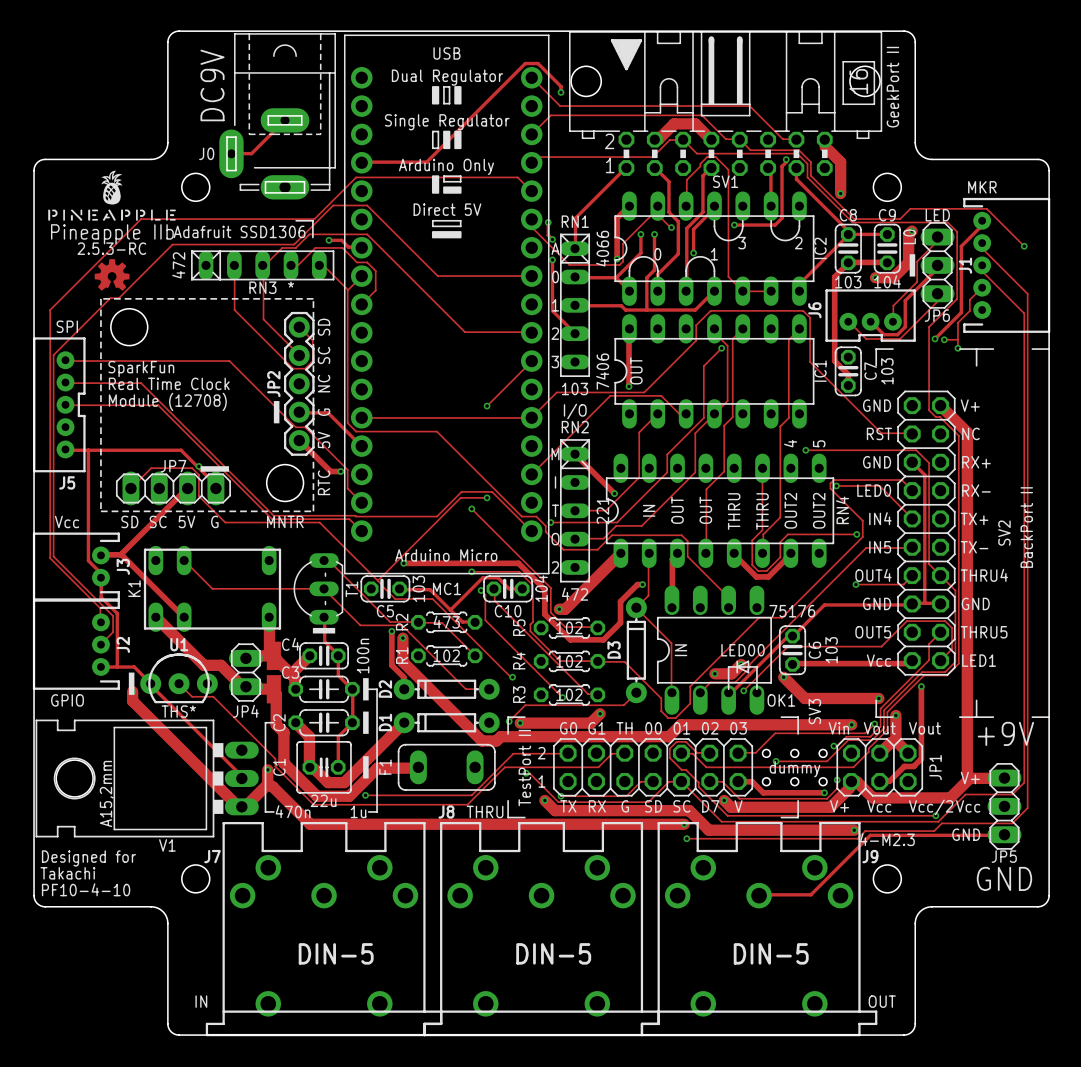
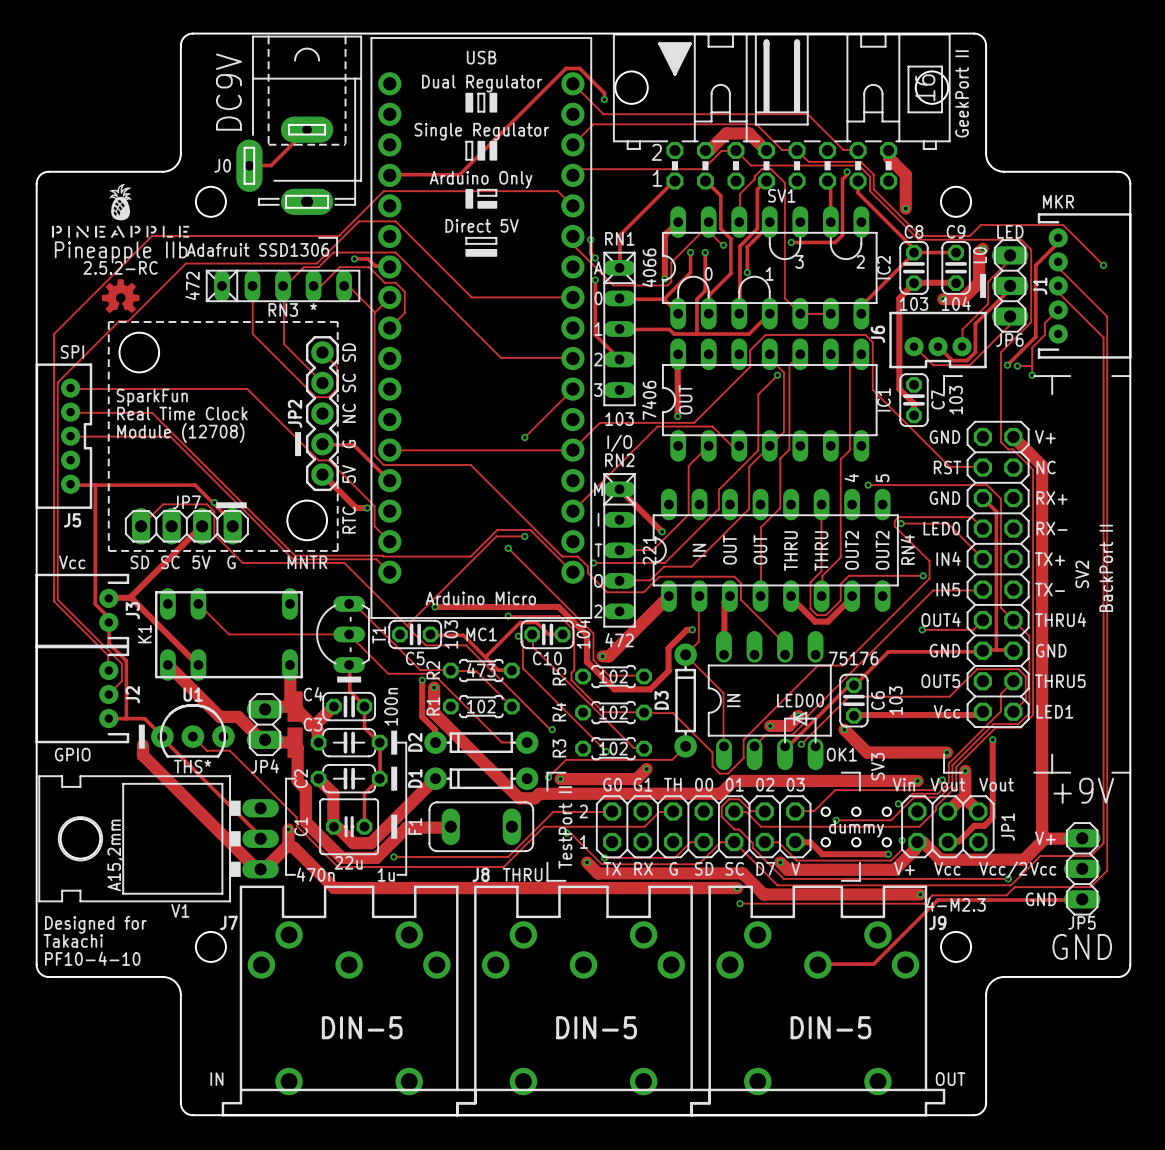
text: 2.5.3-RC (111, 248) -> 2.5.2-RC (120, 267)

